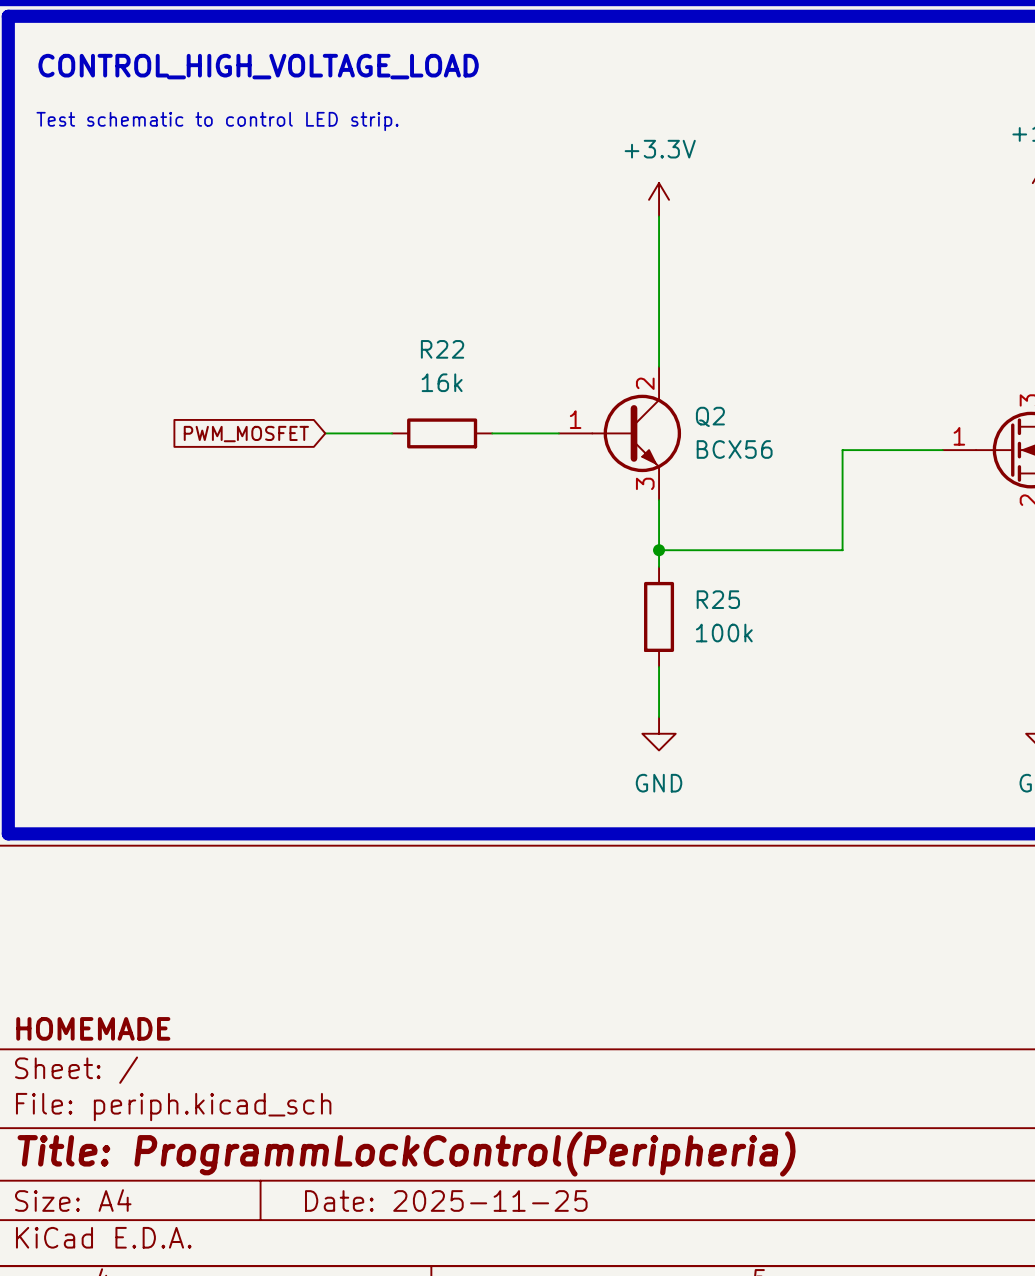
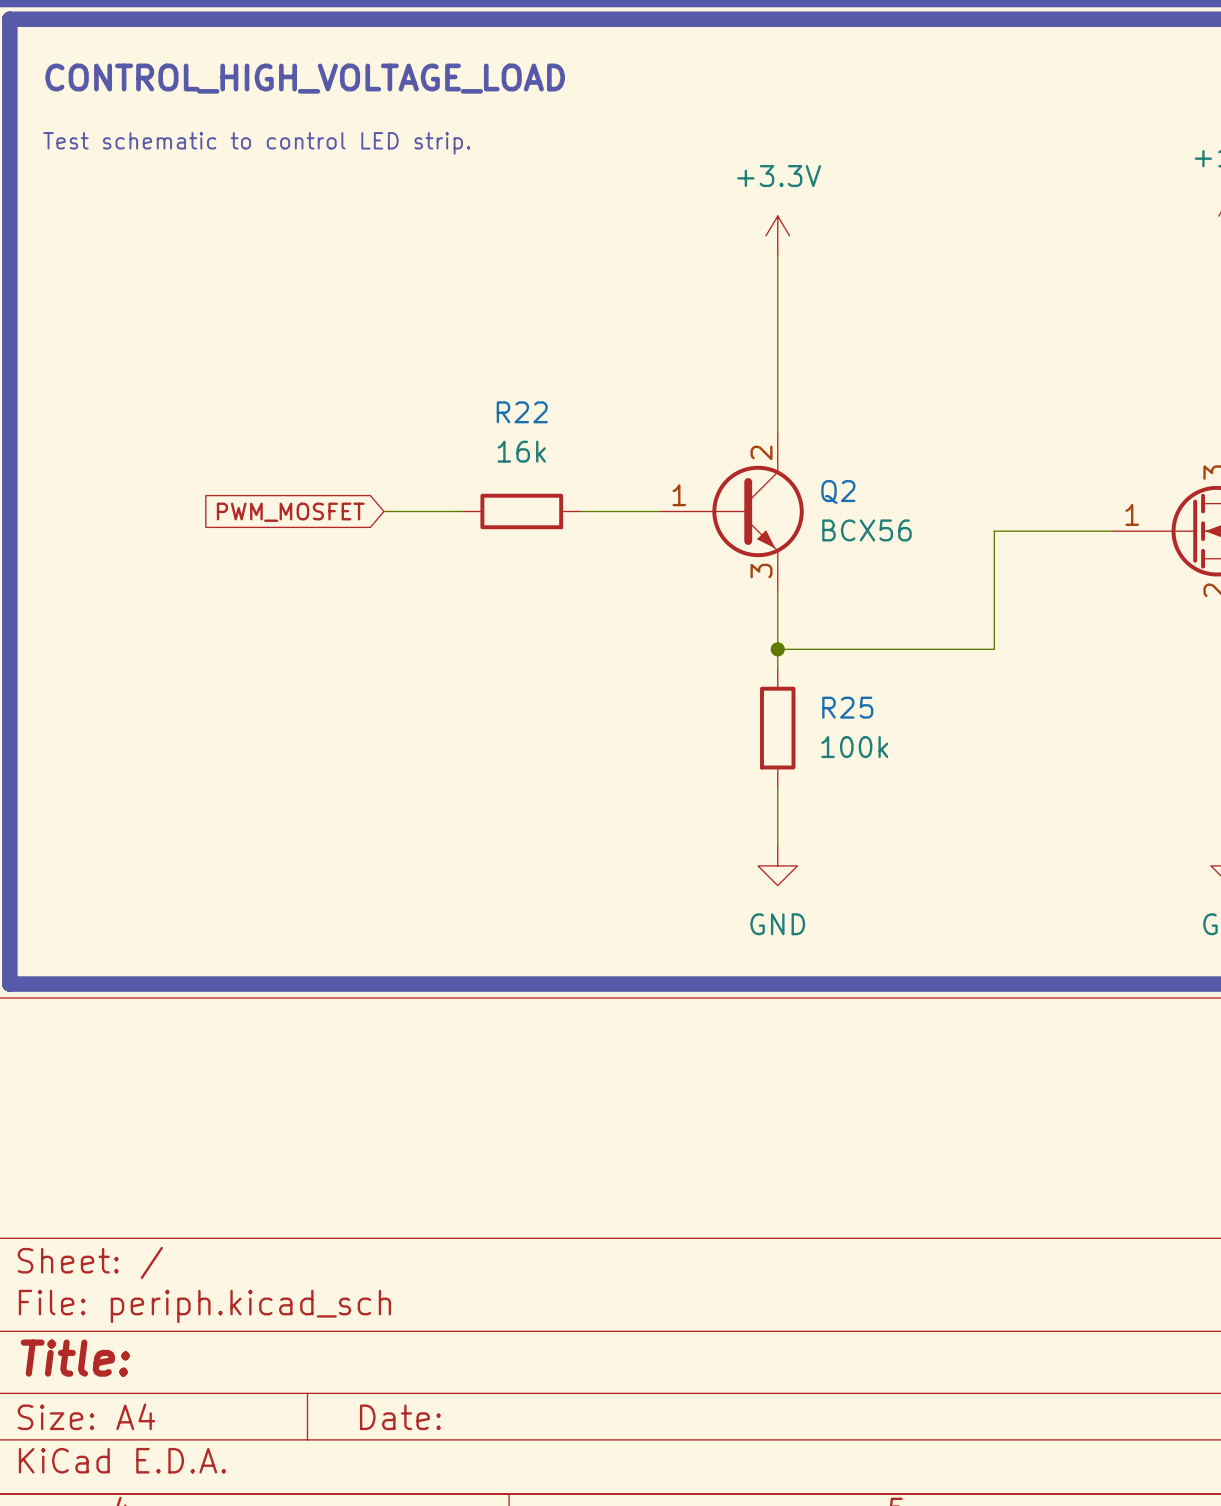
title block: HOMEMADE (93, 1028) -> none
title block: Title: ProgrammLockControl(Peripheria) (406, 1153) -> Title: (75, 1358)
title block: Date: 2025-11-25 (446, 1200) -> Date: (400, 1417)

